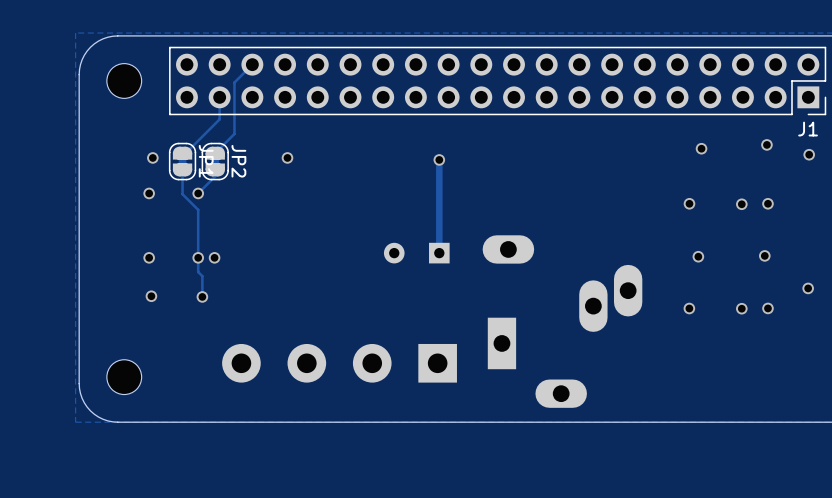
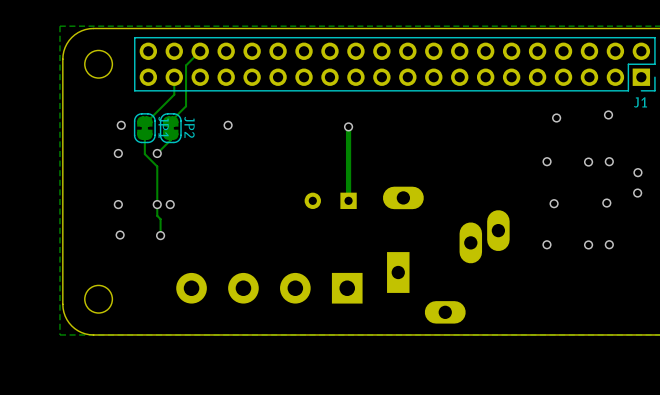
via: (809, 154) -> none
via: none -> (637, 172)
via: none -> (637, 193)
via: (808, 288) -> none

